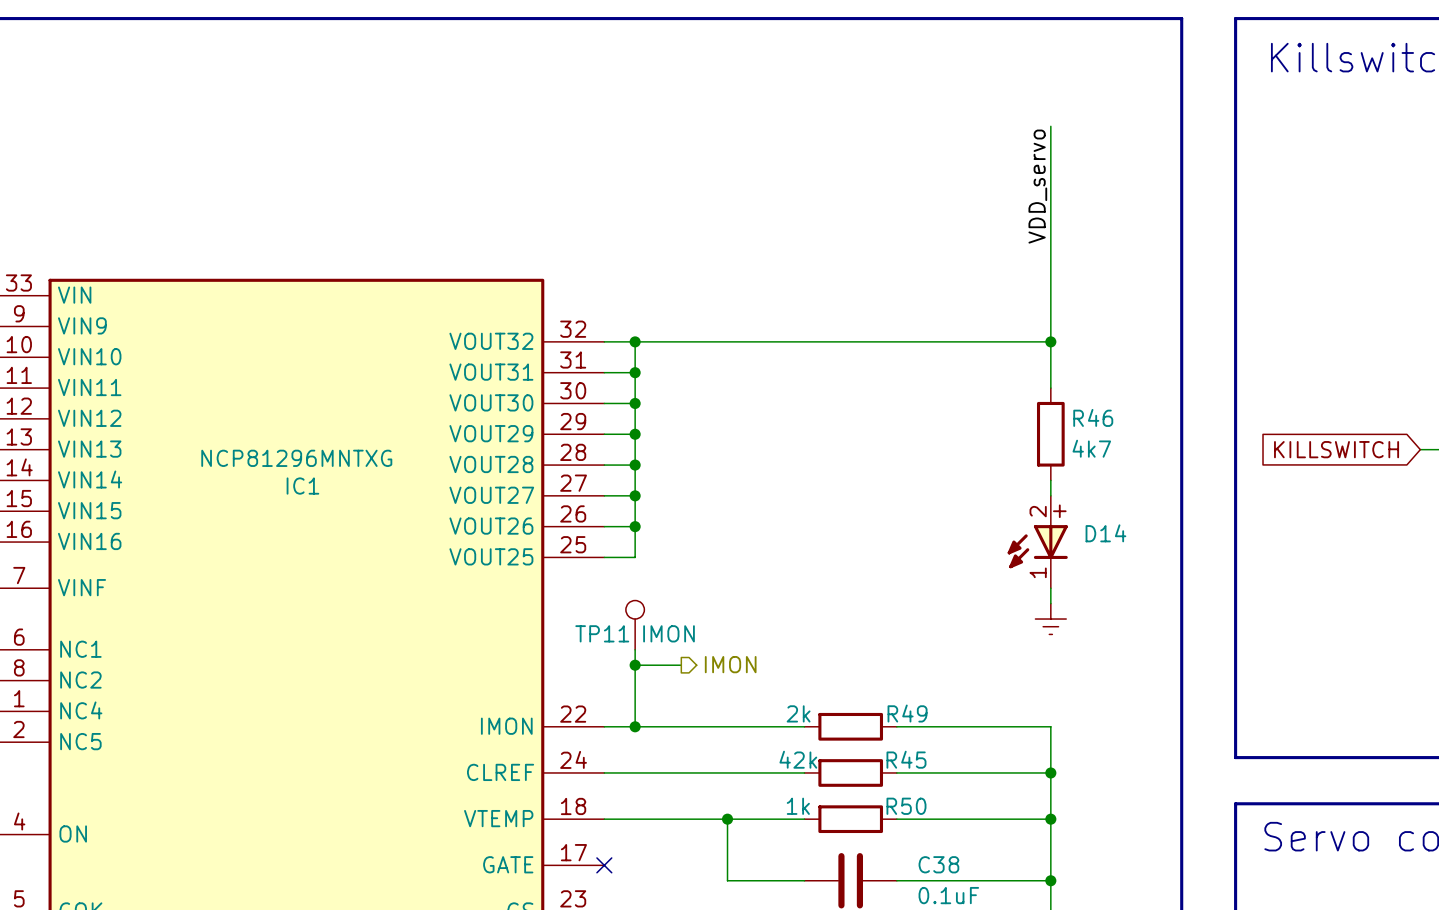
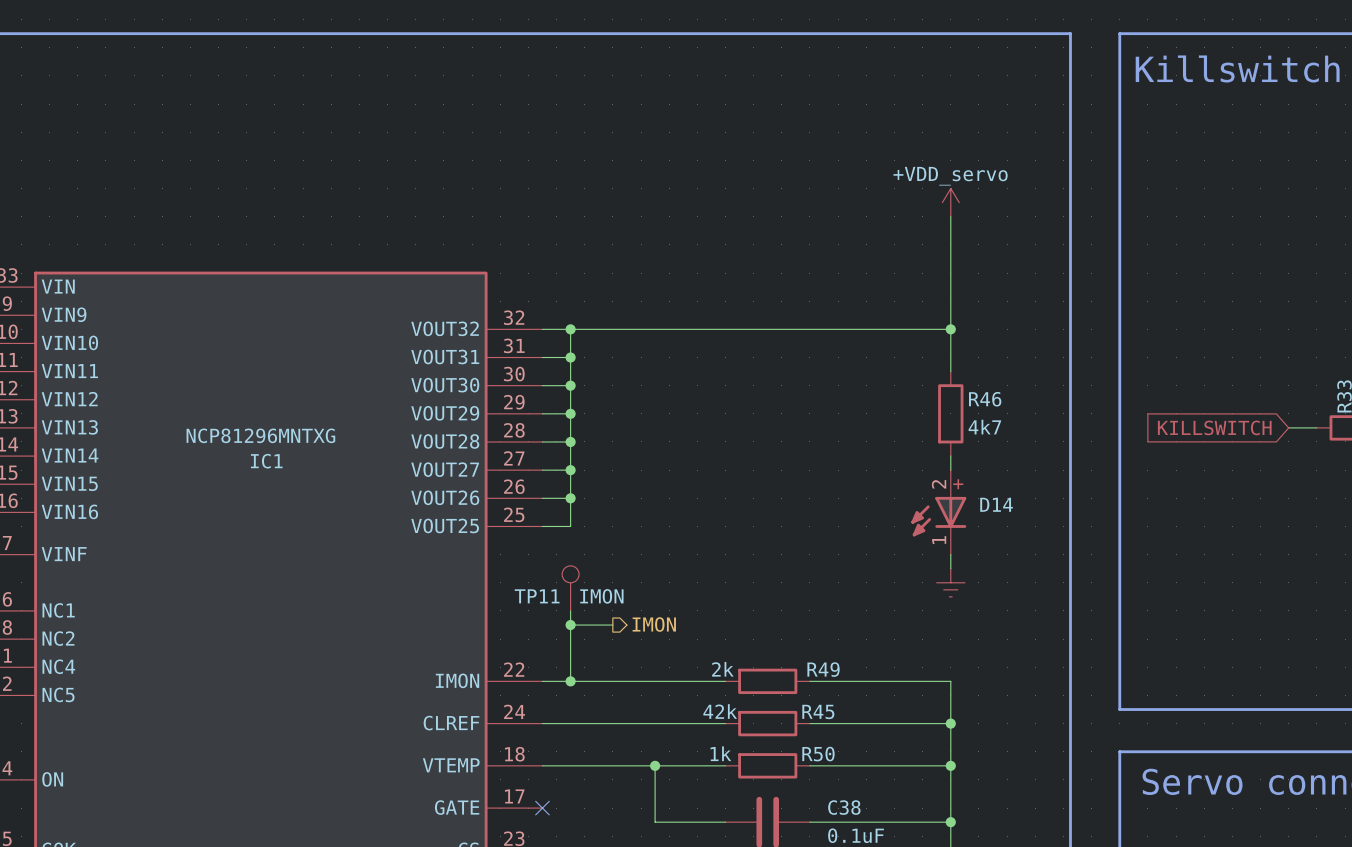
wire: (1050, 126) (1050, 218) -> none
label: VDD_servo (1037, 186) -> none
power symbol: none -> +VDD_servo (950, 202)

